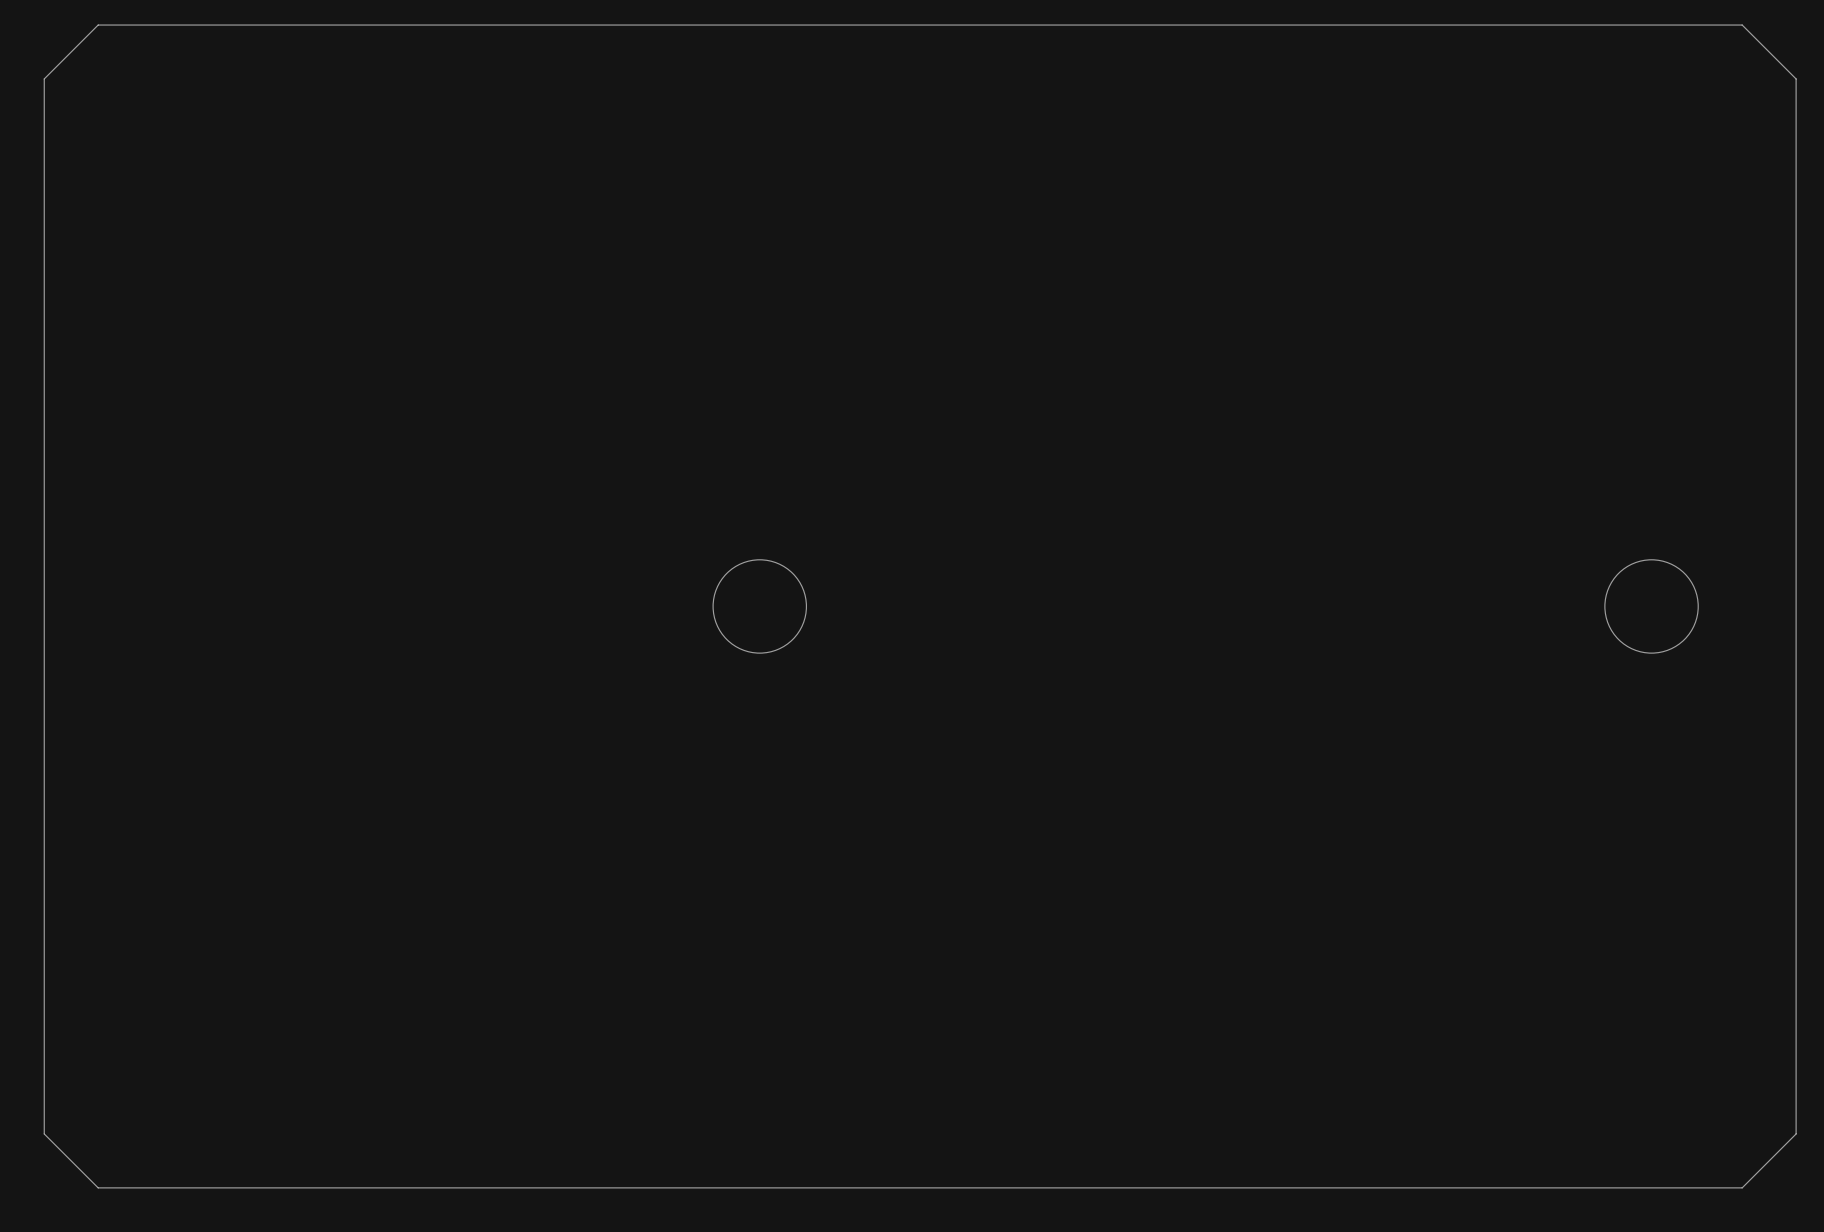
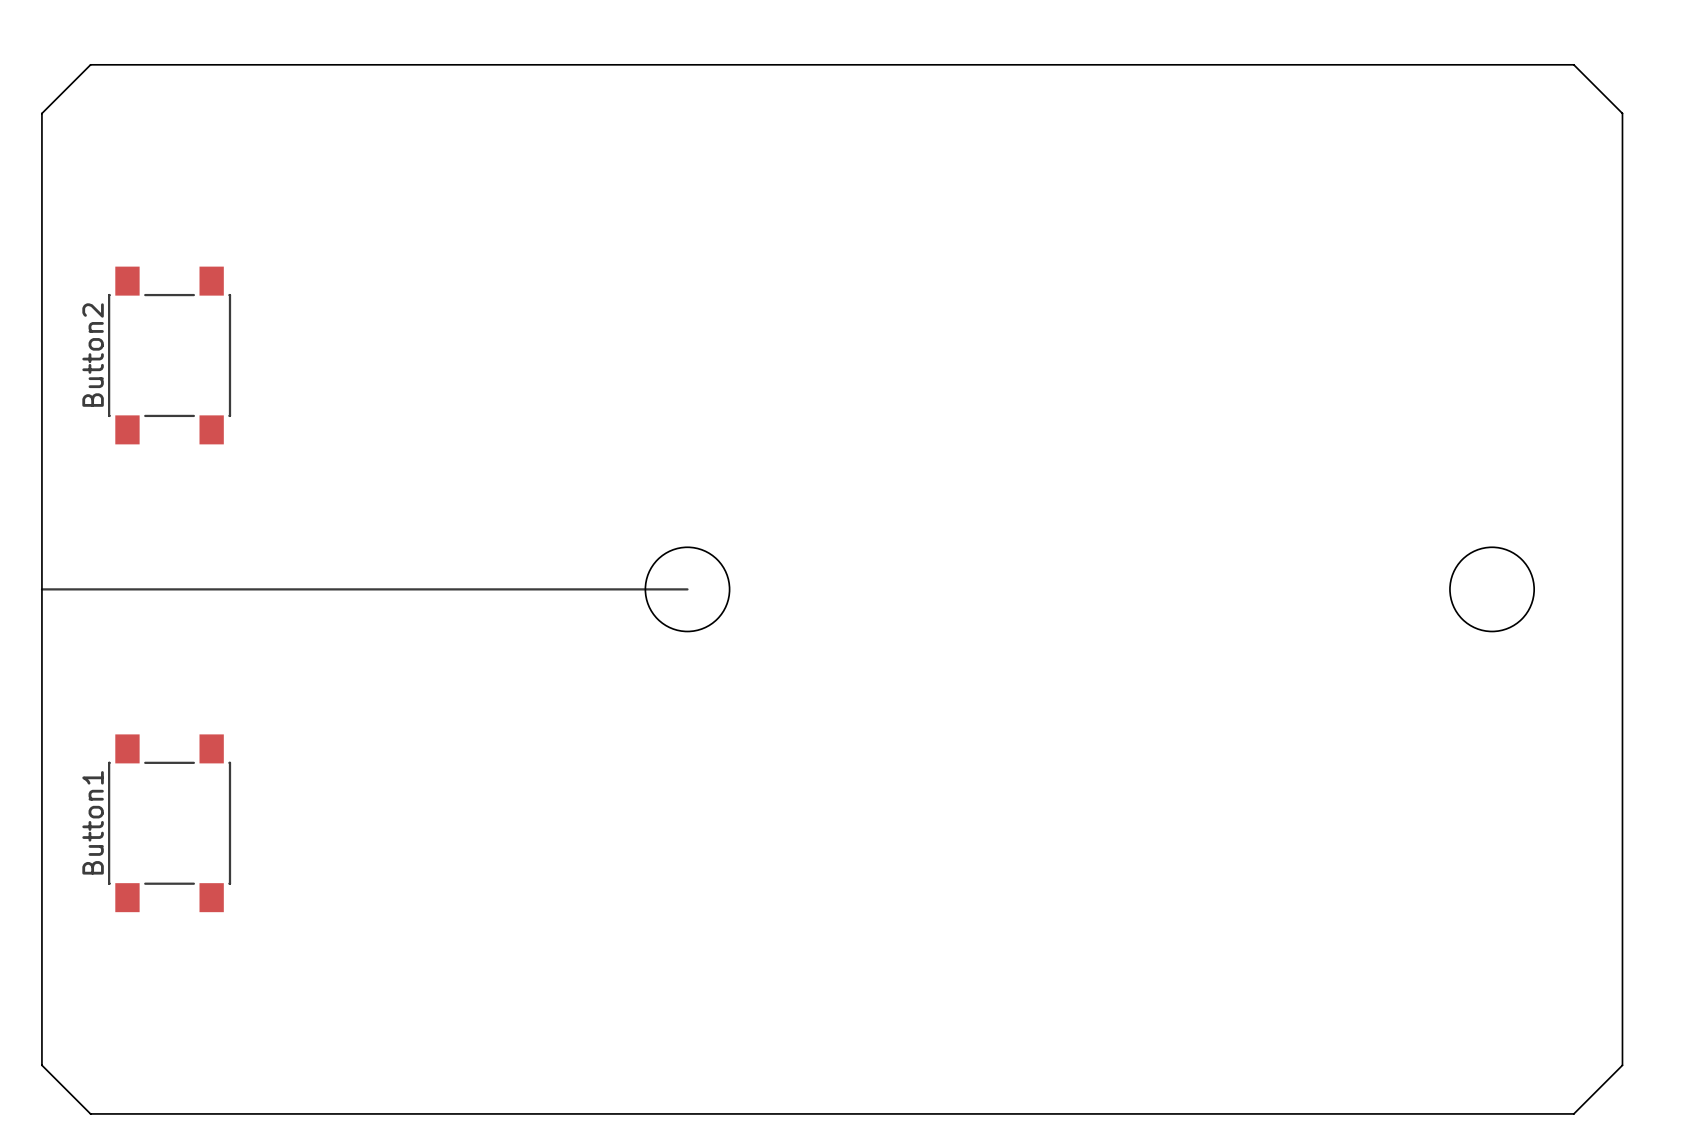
Button2: none -> (169, 355)
line: none -> (41, 589) (687, 589)
Button1: none -> (169, 823)

